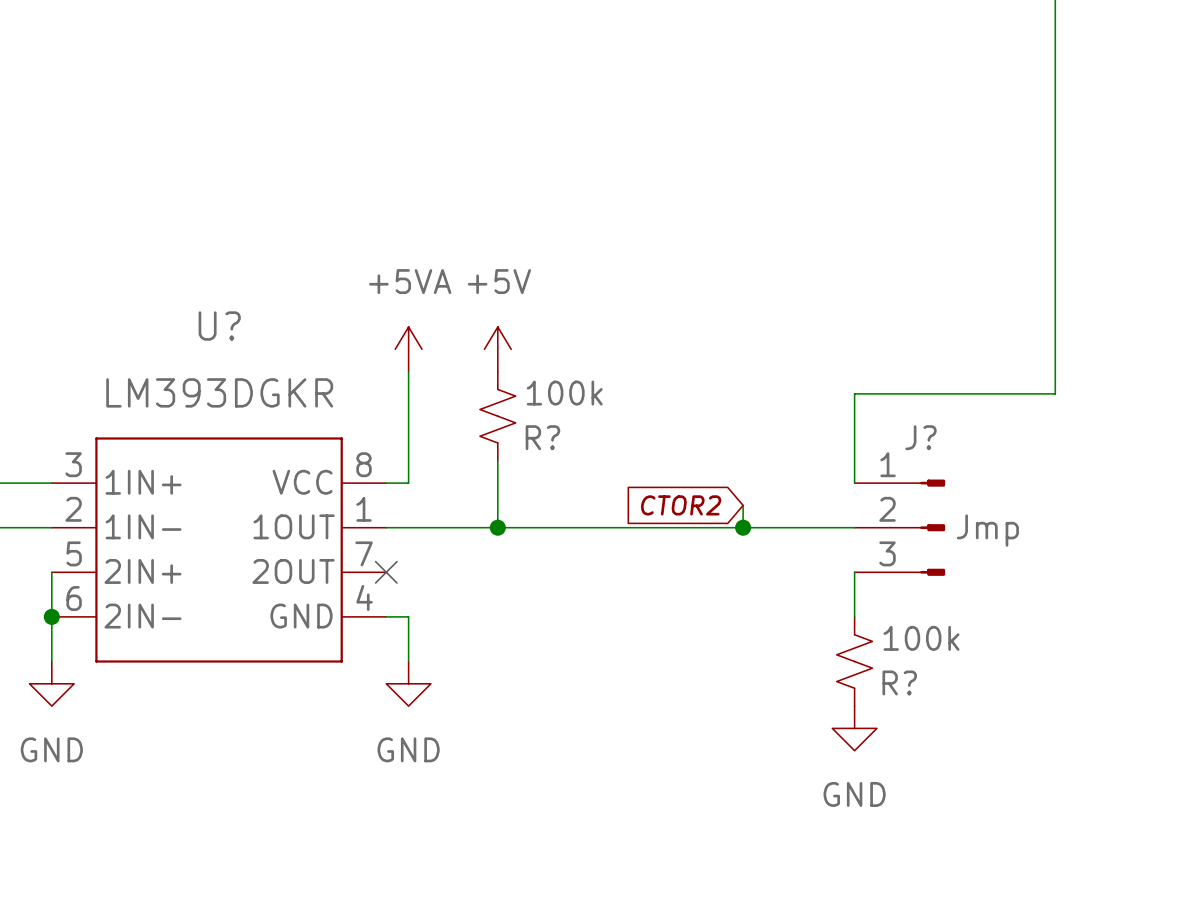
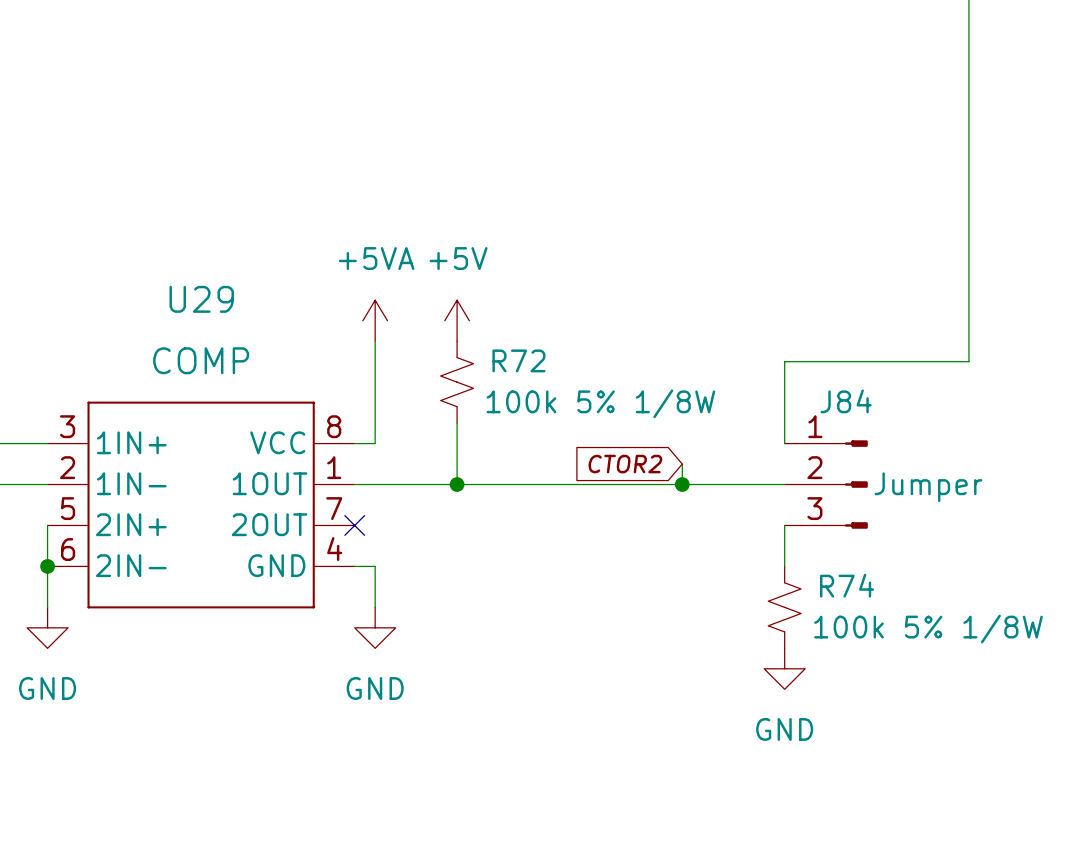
U? name: U? (219, 326) -> U29 (201, 299)
U? value: LM393DGKR (219, 392) -> COMP (201, 360)
R? value: 100k (564, 393) -> 100k 5% 1/8W (600, 403)
R? name: R? (542, 437) -> R72 (518, 360)
J? name: J? (920, 437) -> J84 (846, 401)
J? value: Jmp (987, 530) -> Jumper (928, 487)
R? value: 100k (921, 638) -> 100k 5% 1/8W (928, 629)
R? name: R? (899, 682) -> R74 (847, 585)

